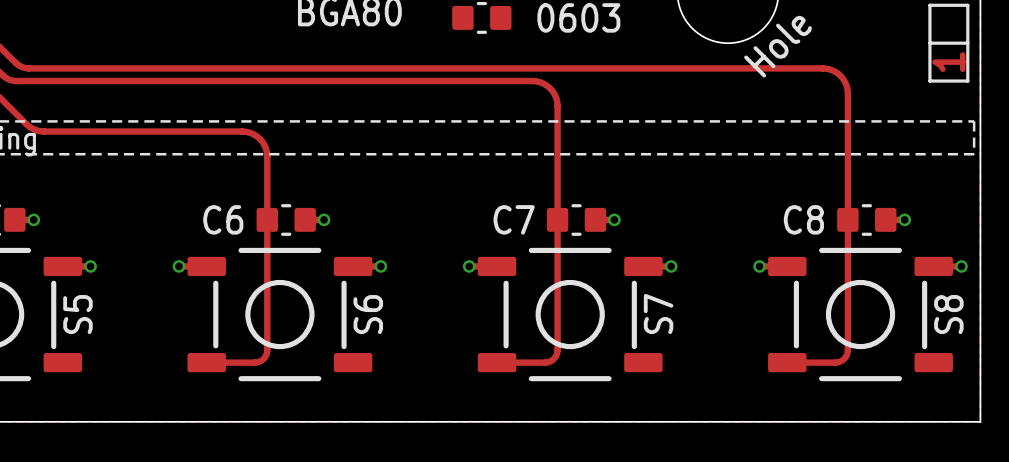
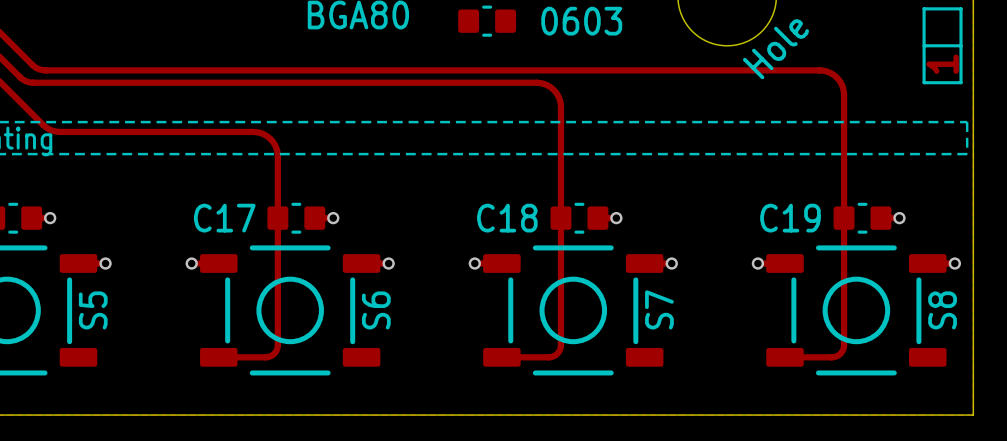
C6 name: C6 (223, 219) -> C17 (224, 218)
C7 name: C7 (514, 219) -> C18 (507, 218)
C8 name: C8 (803, 219) -> C19 (790, 218)

